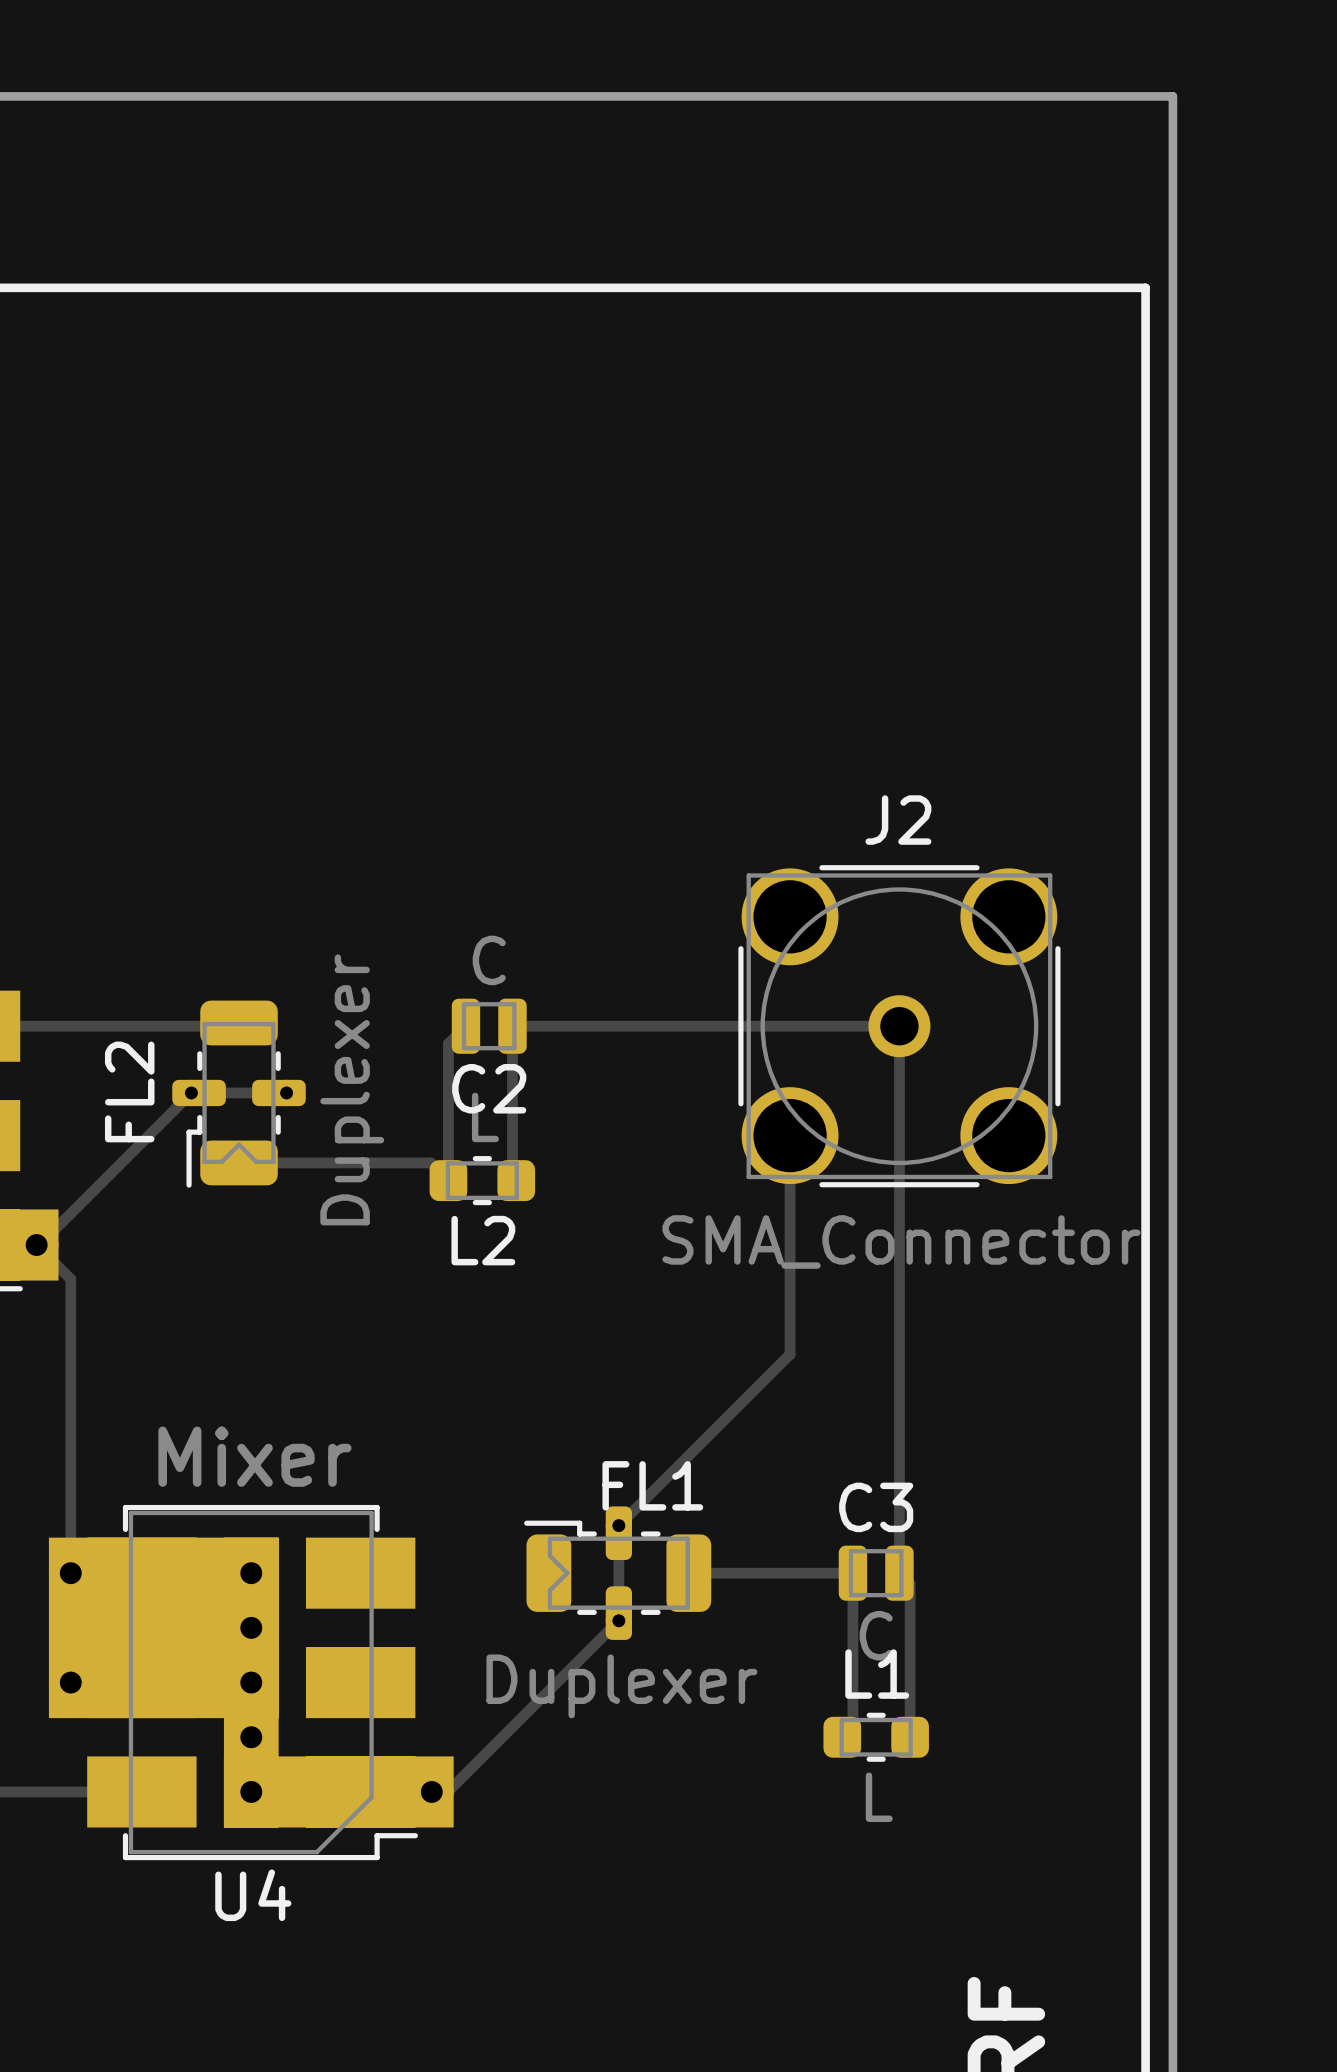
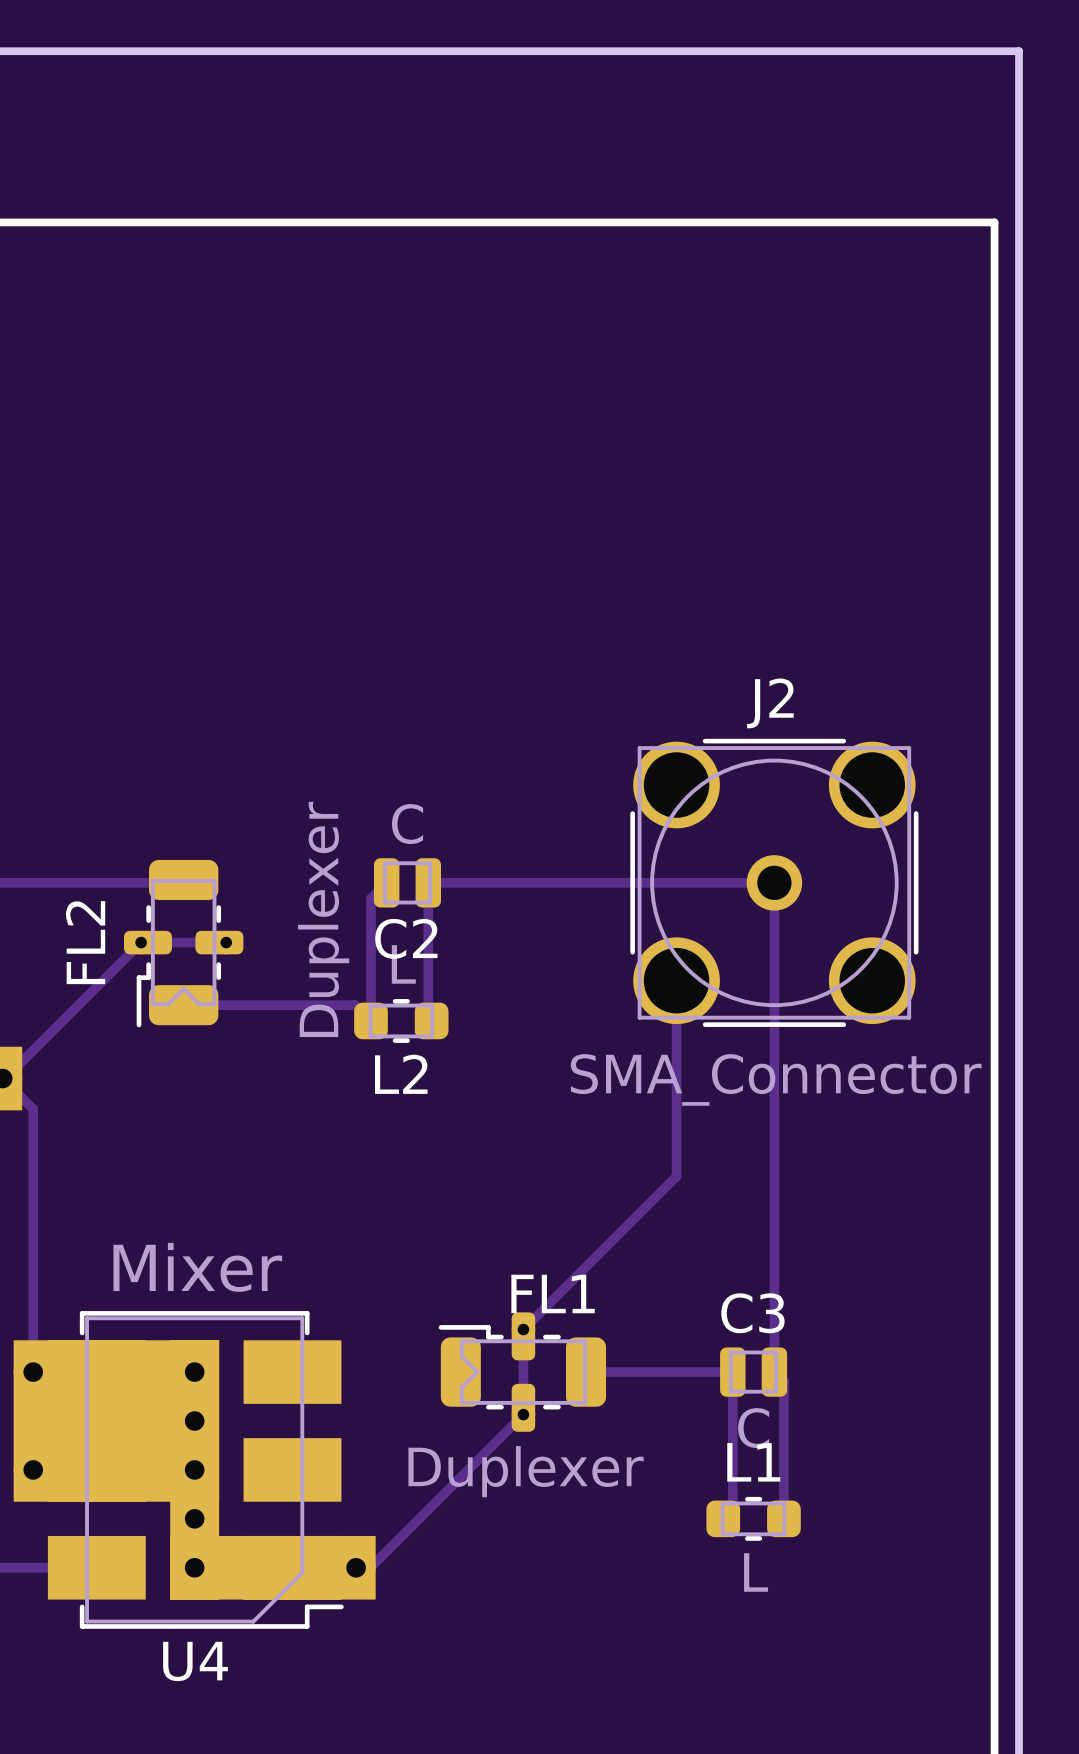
FL2 value position: Duplexer (352, 1089) -> Duplexer (323, 919)

